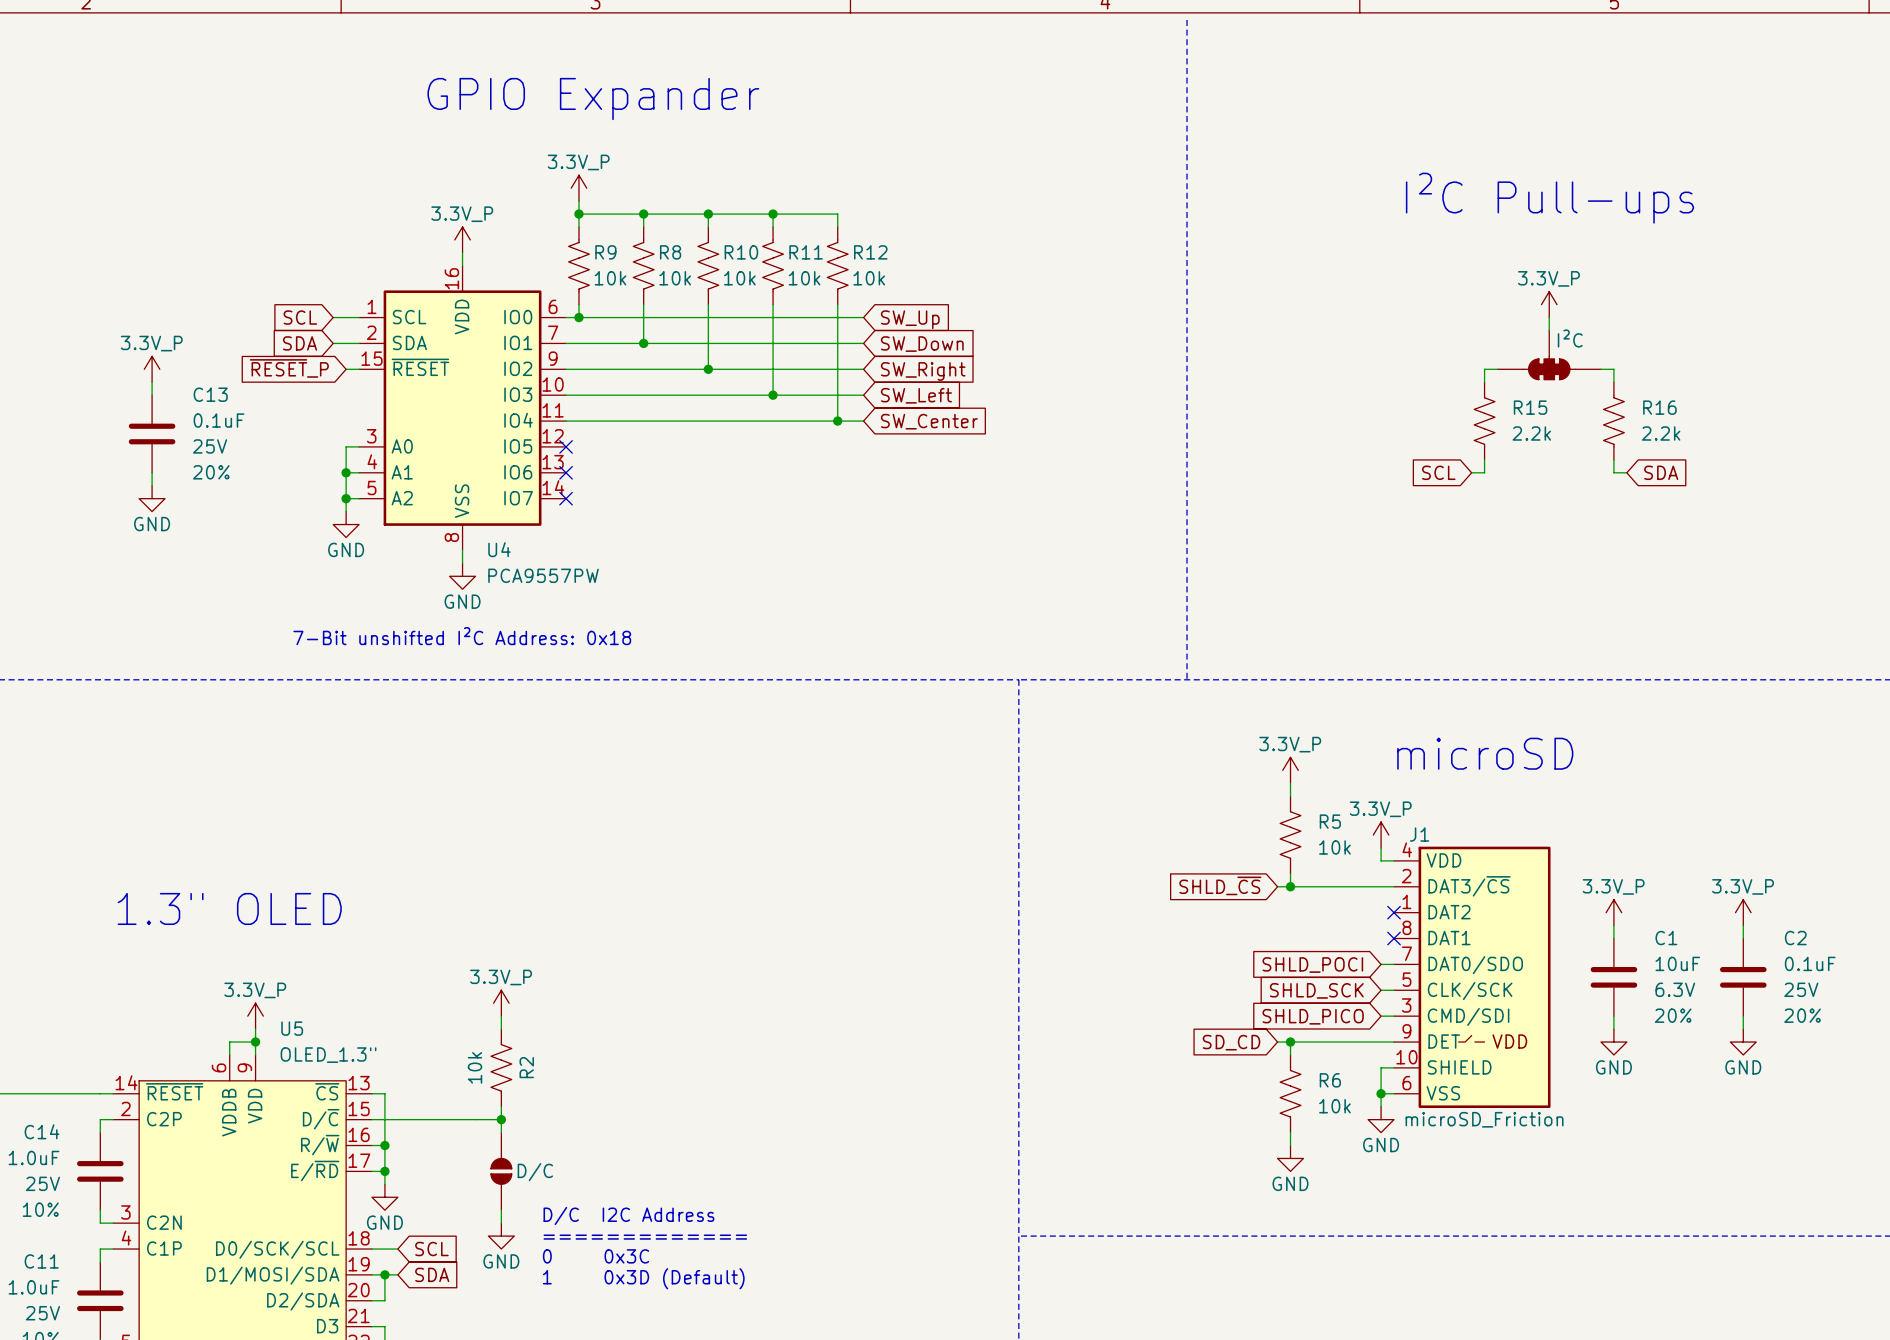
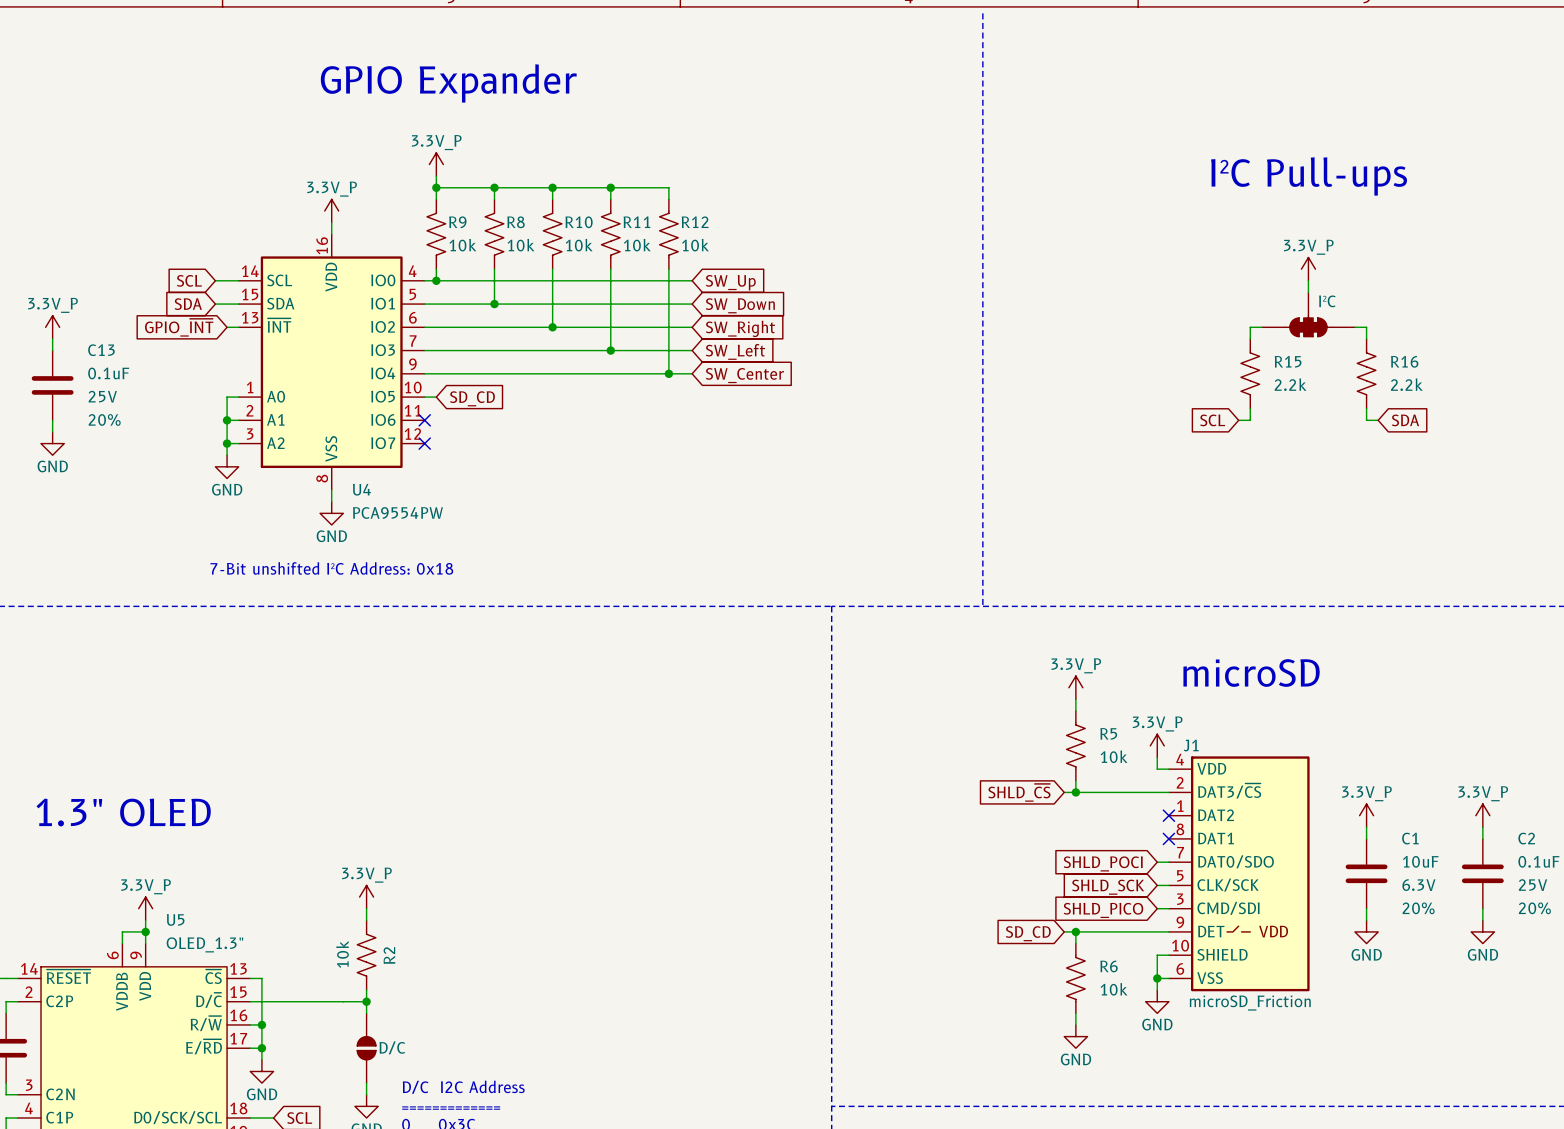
U4 symbol: [359, 265, 567, 551] -> [238, 234, 425, 491]
global label: ~{RESET}_P (289, 368) -> GPIO_~{INT} (179, 327)
wire: none -> (424, 397) (436, 397)
no-connect mark: (566, 446) -> none
global label: none -> SD_CD (472, 398)
U4 value: PCA9557PW (543, 575) -> PCA9554PW (397, 512)

